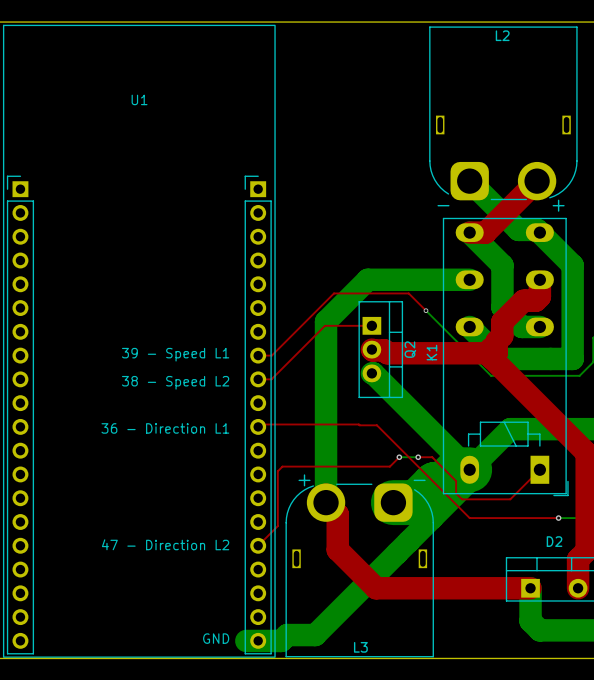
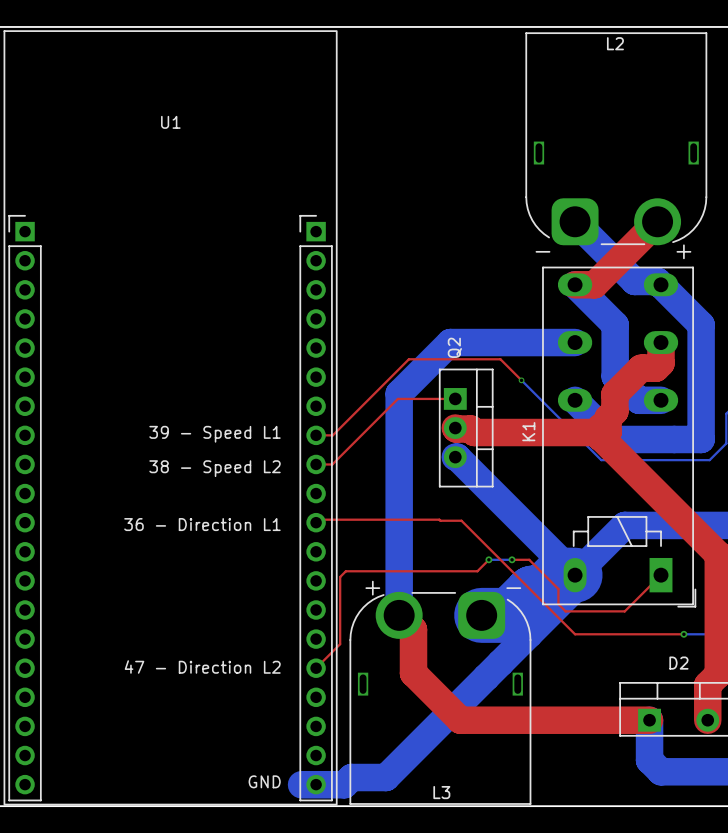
Q2 name position: Q2 (410, 349) -> Q2 (454, 347)

